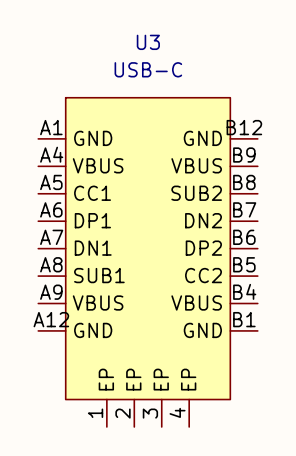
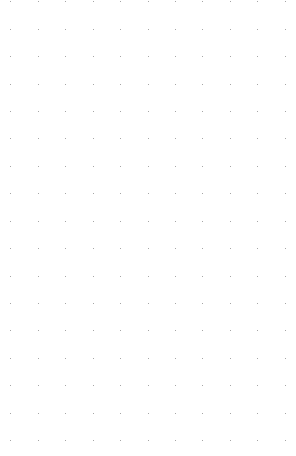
U3: USB-C (148, 262) -> none

